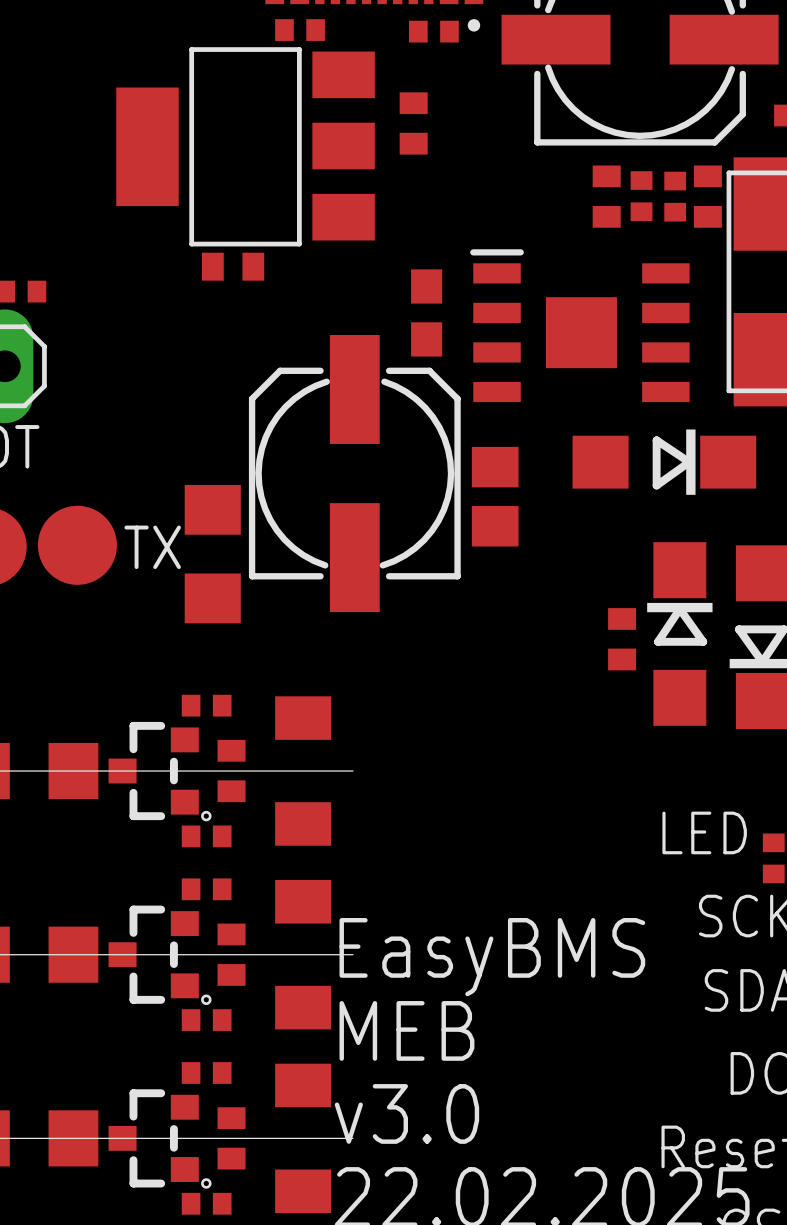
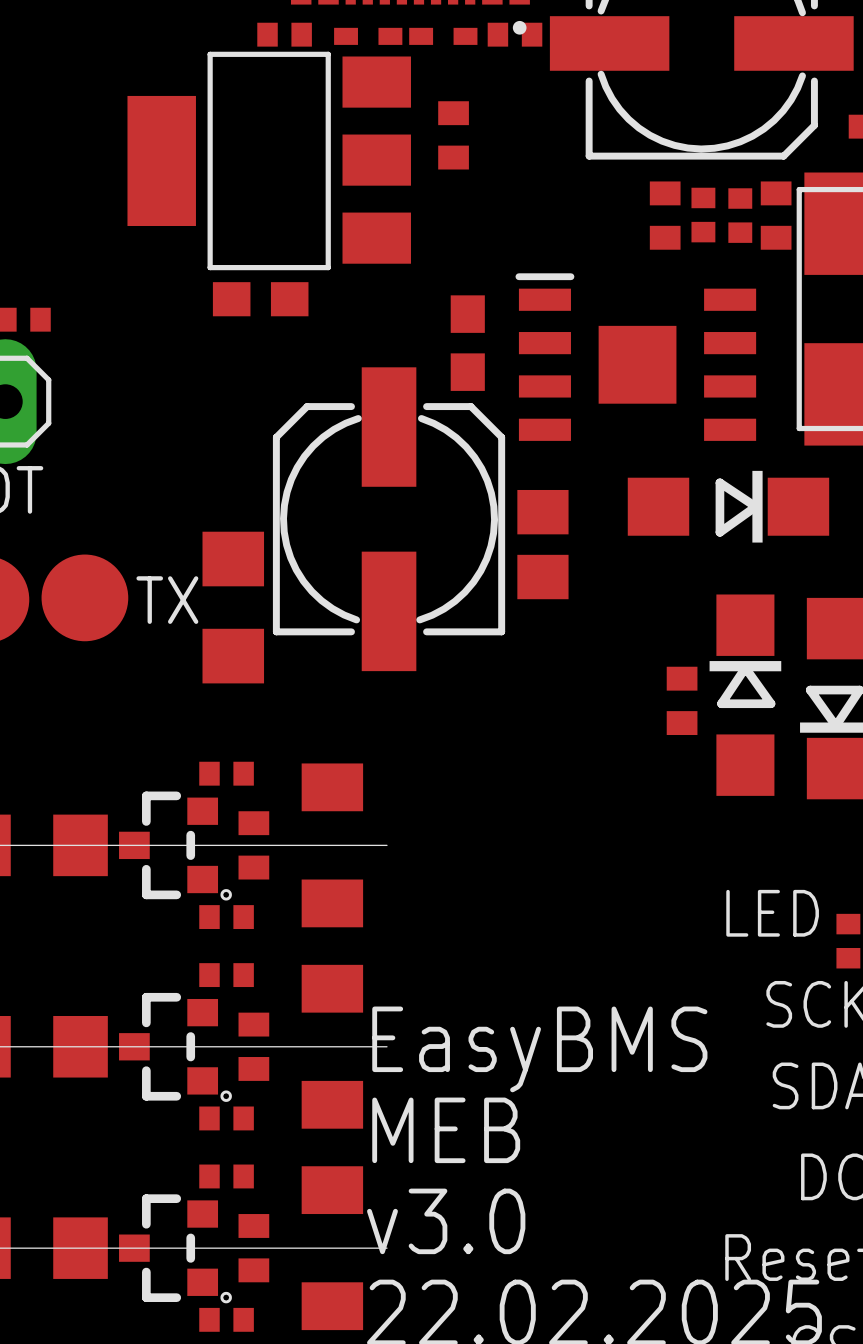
part position: (300, 30) -> (284, 34)
part position: (433, 31) -> (515, 34)
part: none -> (368, 36)
part: none -> (443, 36)
part footprint: [201, 252, 265, 281] -> [212, 282, 309, 317]

